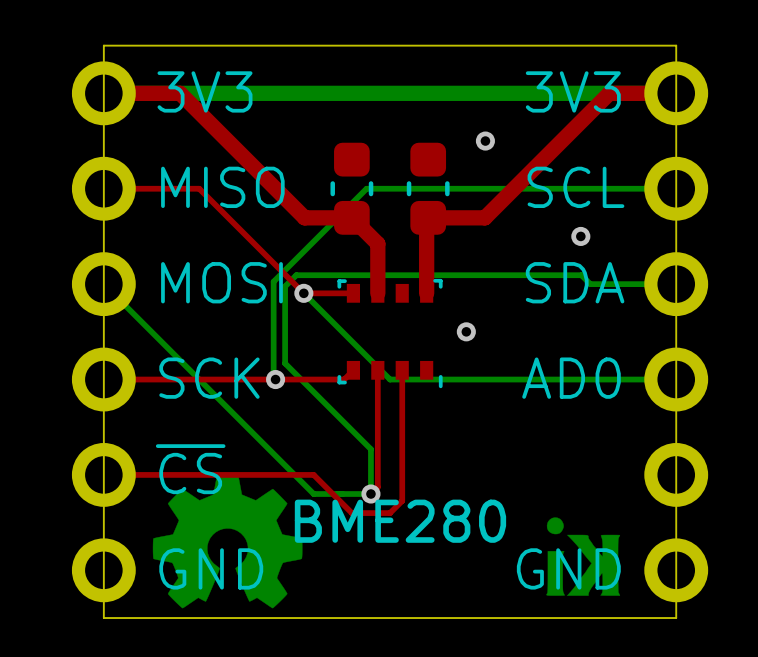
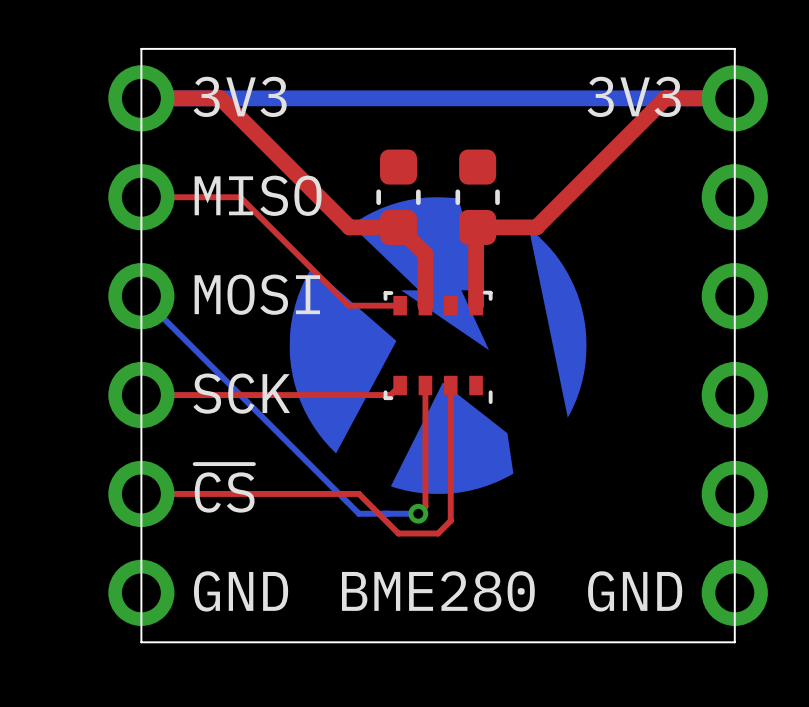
via: (485, 141) -> none
part text: SCL (575, 187) -> none
drawing: none -> [289, 197, 587, 494]
bottom track: (676, 188) (366, 188) (273, 281) (273, 377) (275, 379) -> none
via: (580, 236) -> none
part text: SDA (575, 282) -> none
bottom track: (676, 284) (590, 284) (581, 275) (296, 275) (285, 286) (285, 363) (370, 449) (370, 494) -> none
bottom track: (303, 293) (390, 379) (676, 379) -> none
via: (303, 293) -> none
via: (466, 331) -> none
part text: AD0 (571, 378) -> none
via: (275, 379) -> none
drawing: [152, 474, 303, 609] -> none
drawing: [546, 517, 621, 596] -> none
part value position: BME280 (400, 521) -> BME280 (438, 591)

